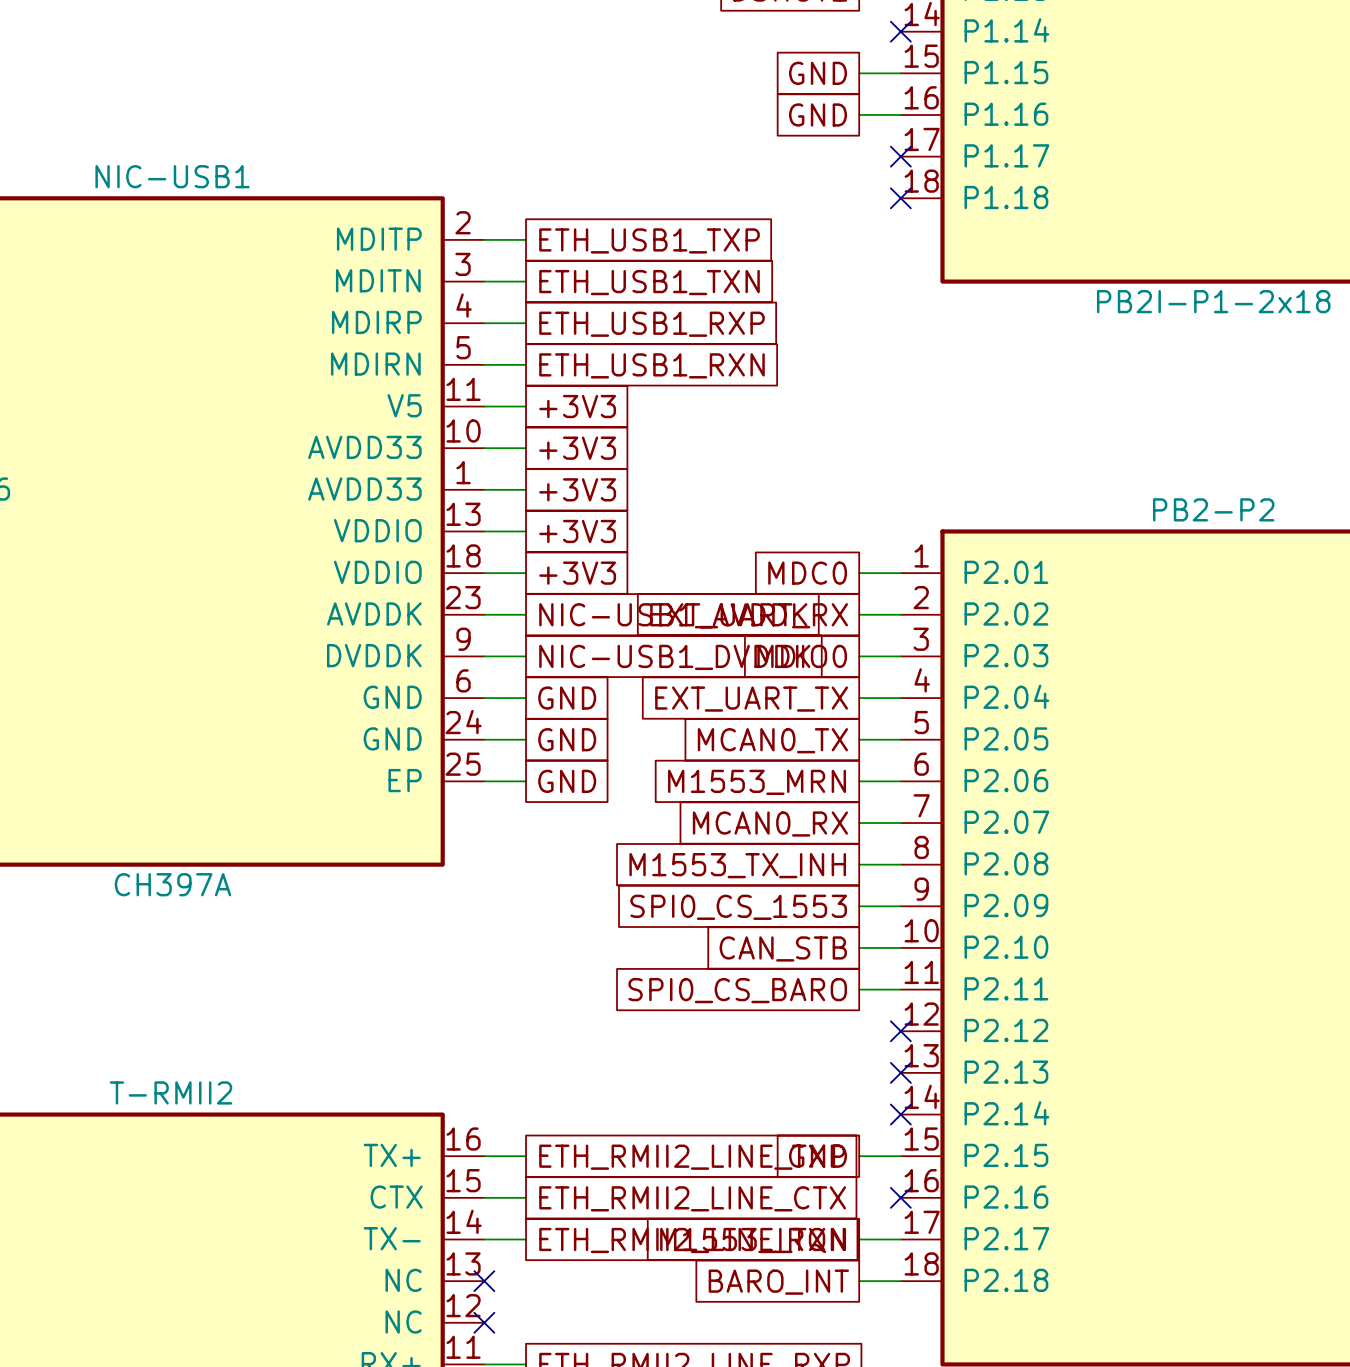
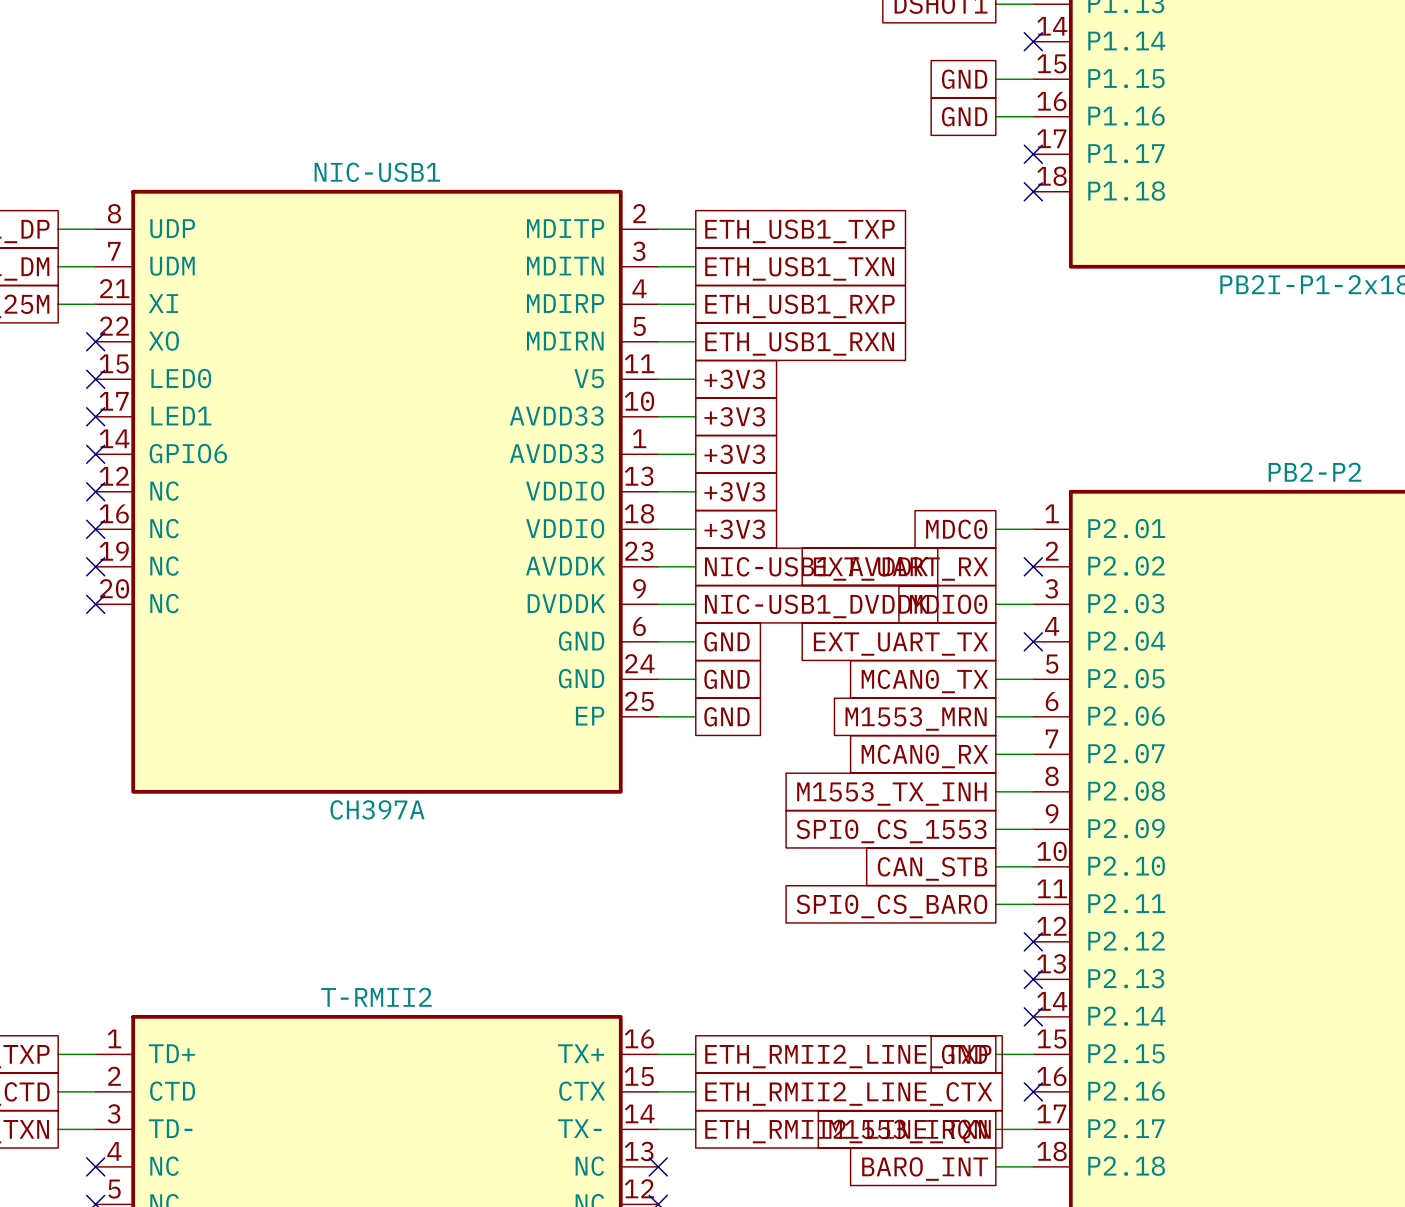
wire: (859, 614) (900, 614) -> none
no-connect mark: none -> (1033, 566)
wire: (859, 698) (900, 698) -> none
no-connect mark: none -> (1033, 641)

